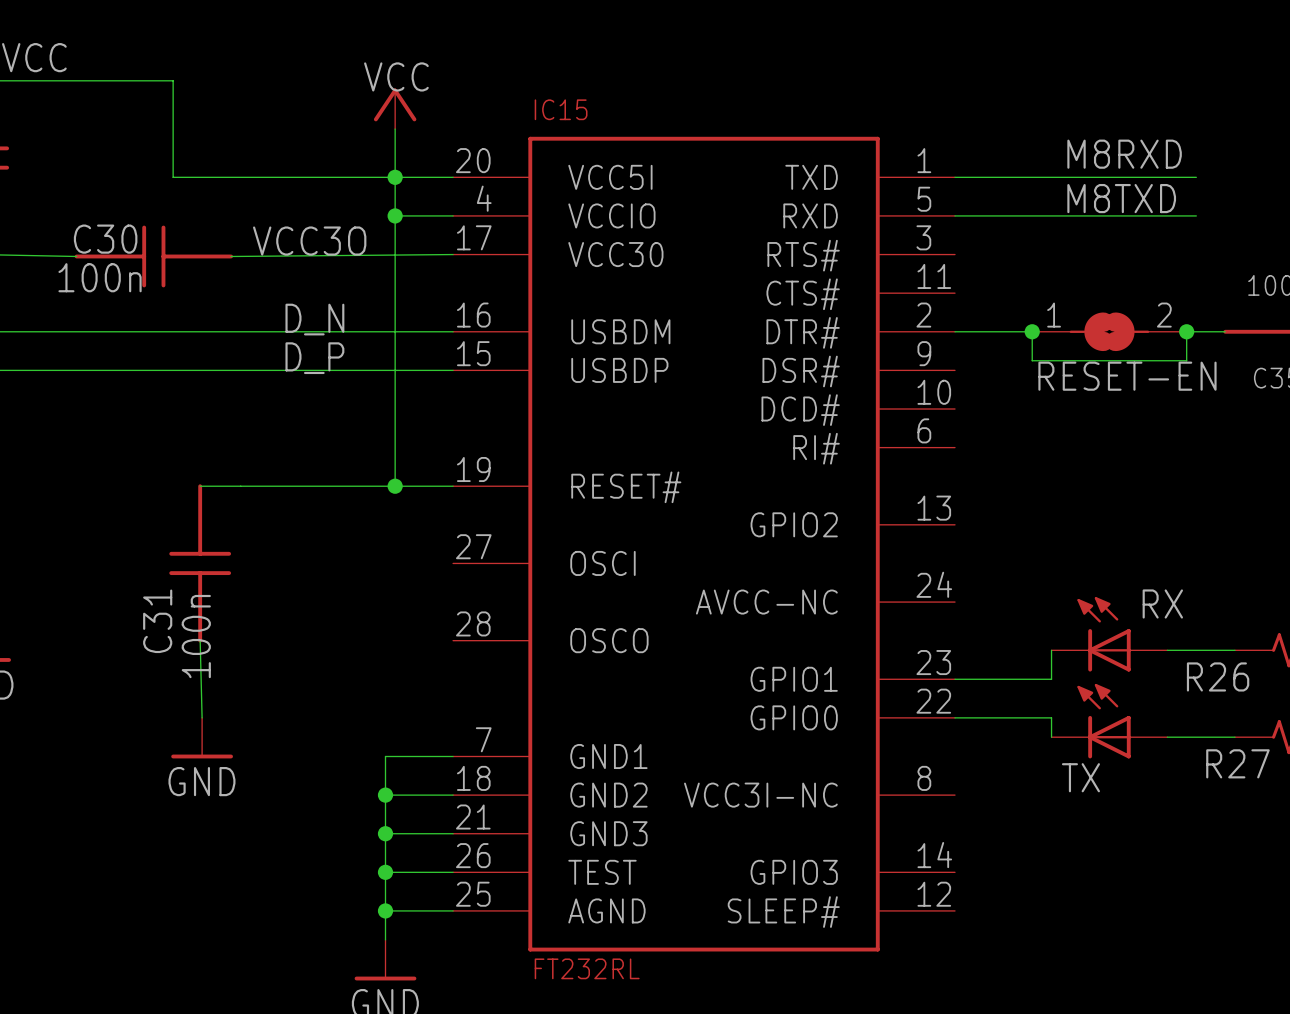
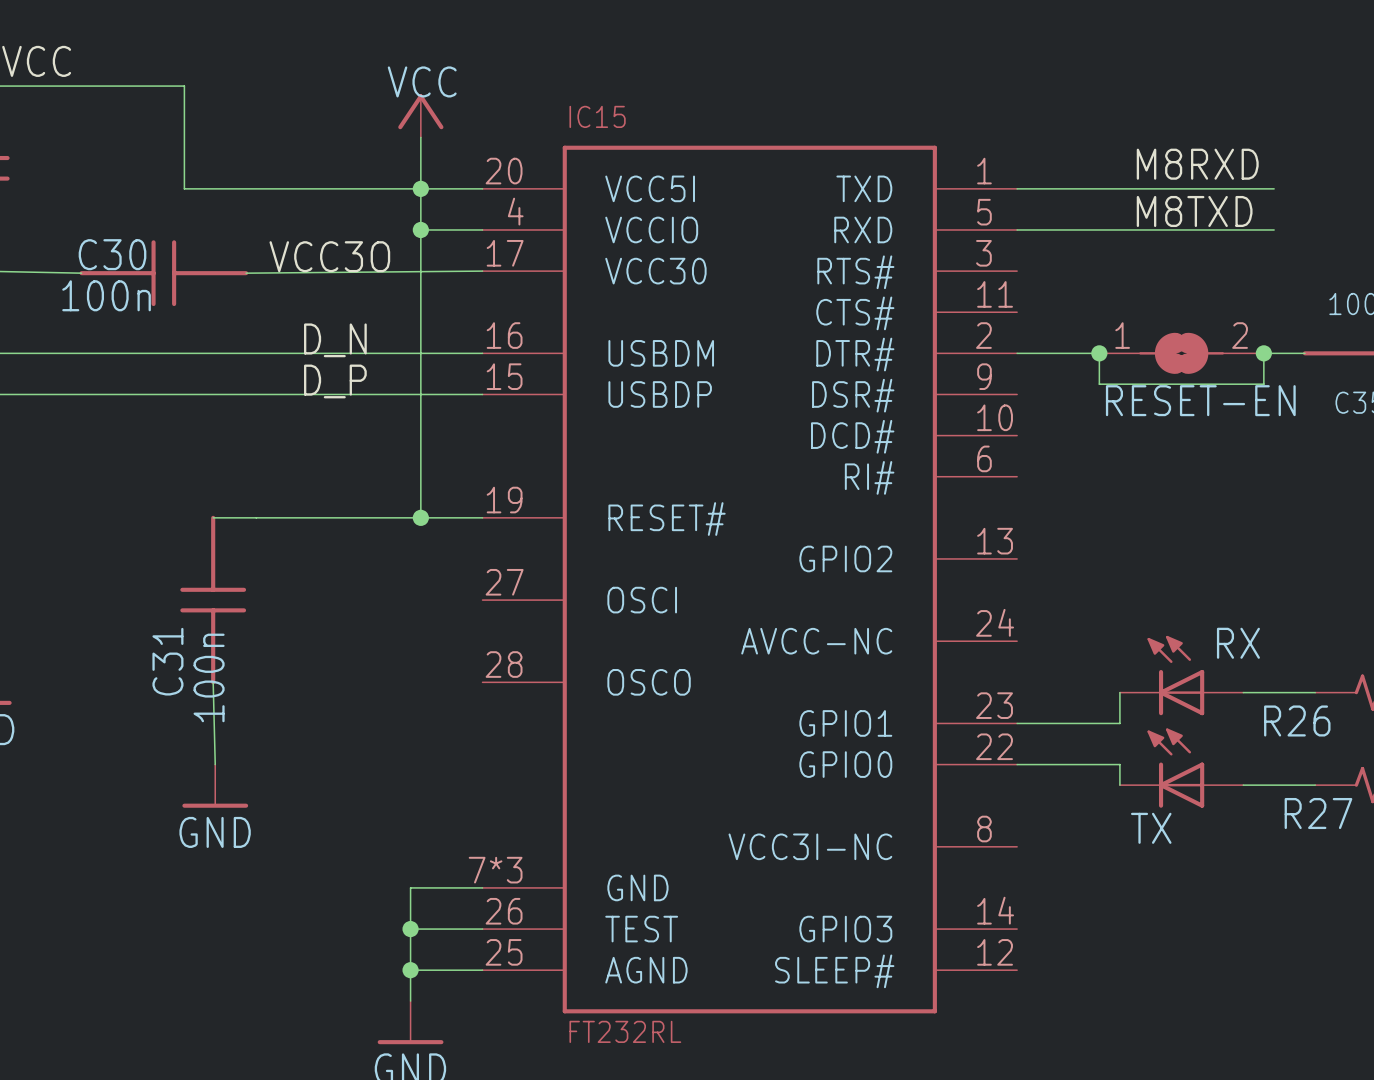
IC15 symbol: [453, 136, 956, 952] -> [482, 145, 1018, 1014]
wire: (453, 756) (385, 756) (385, 833) -> none
wire: (385, 795) (453, 795) -> none
junction: (385, 795) -> none
junction: (385, 833) -> none

